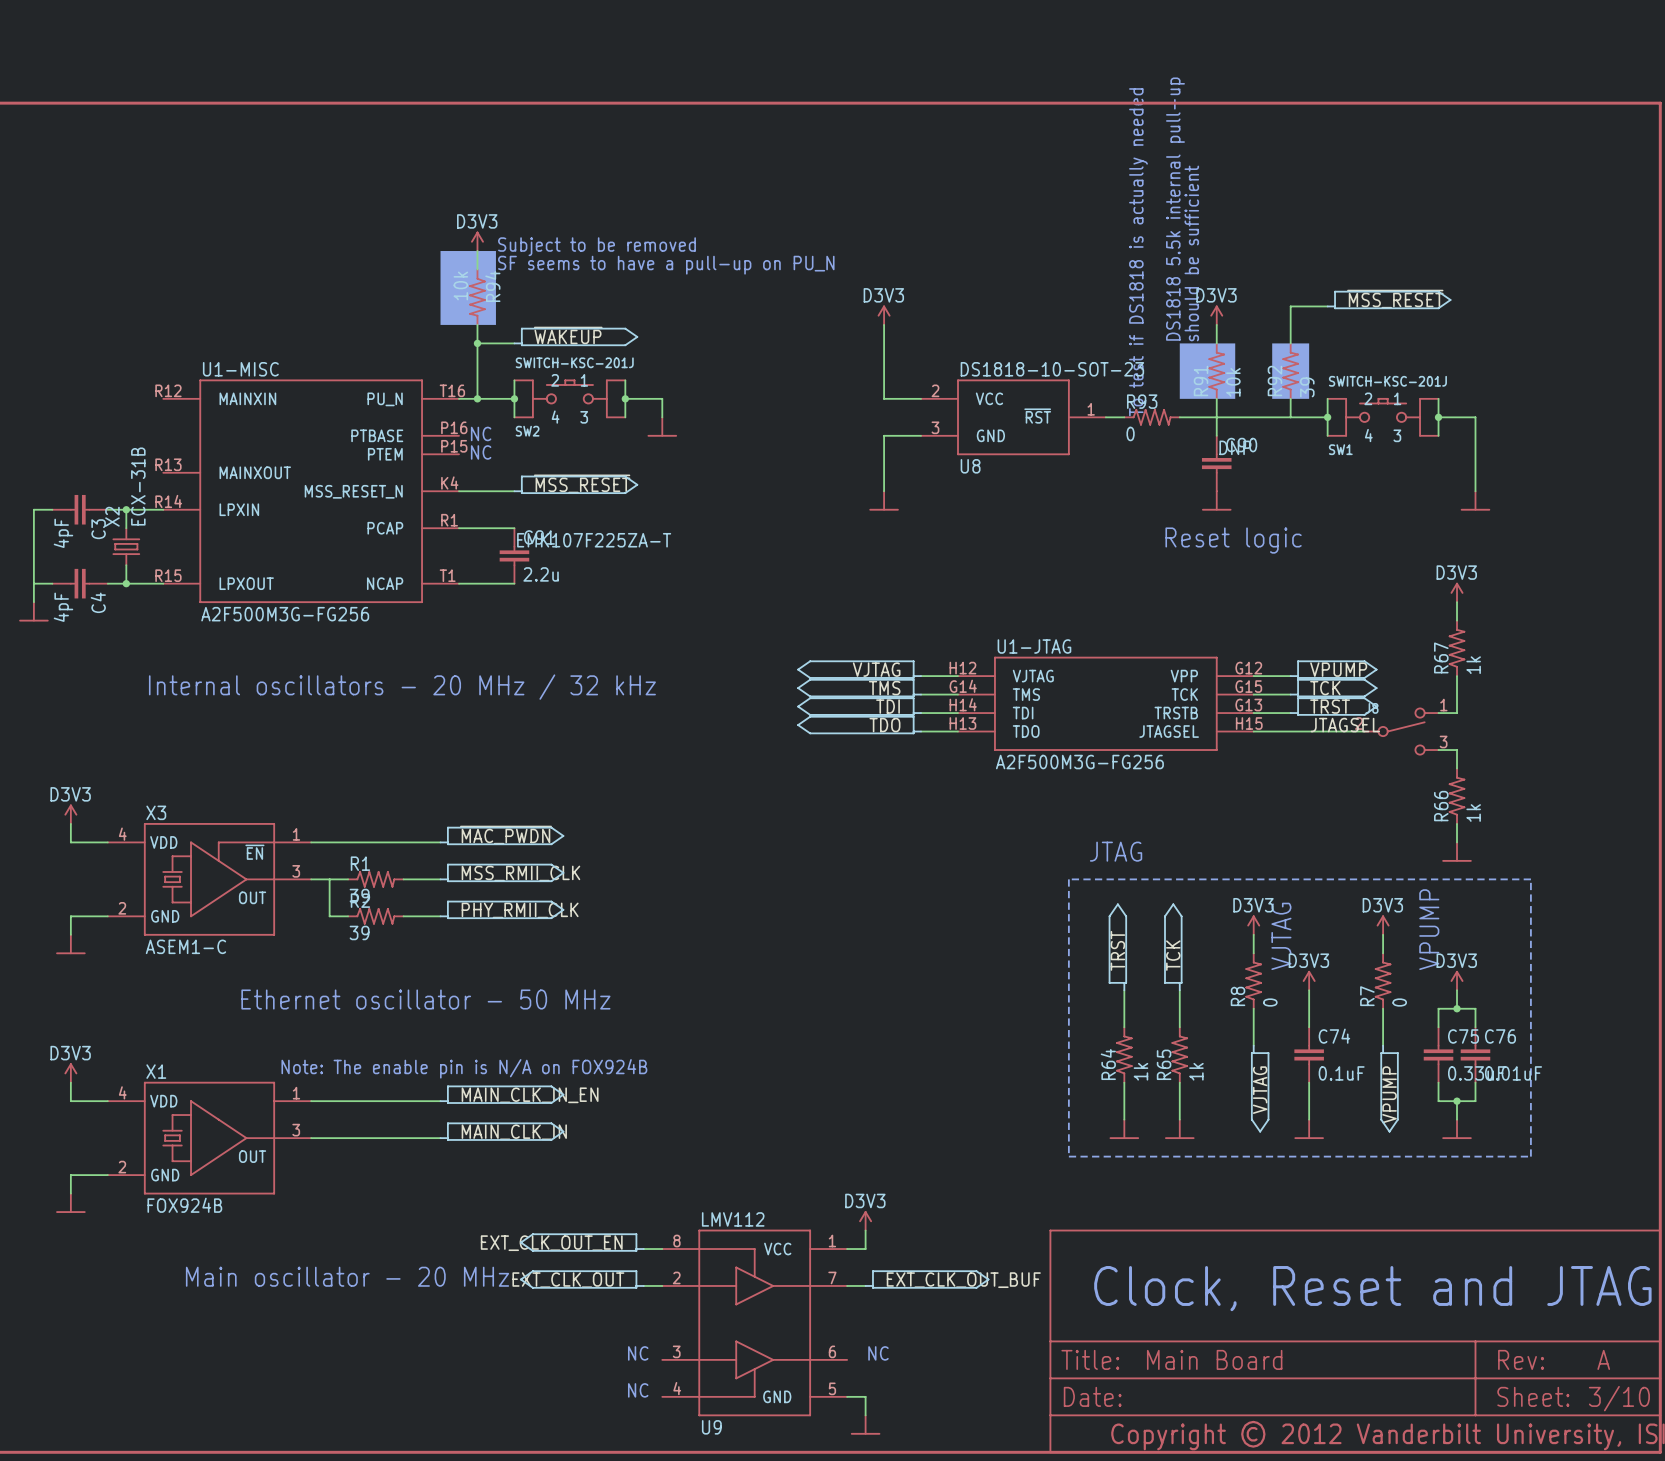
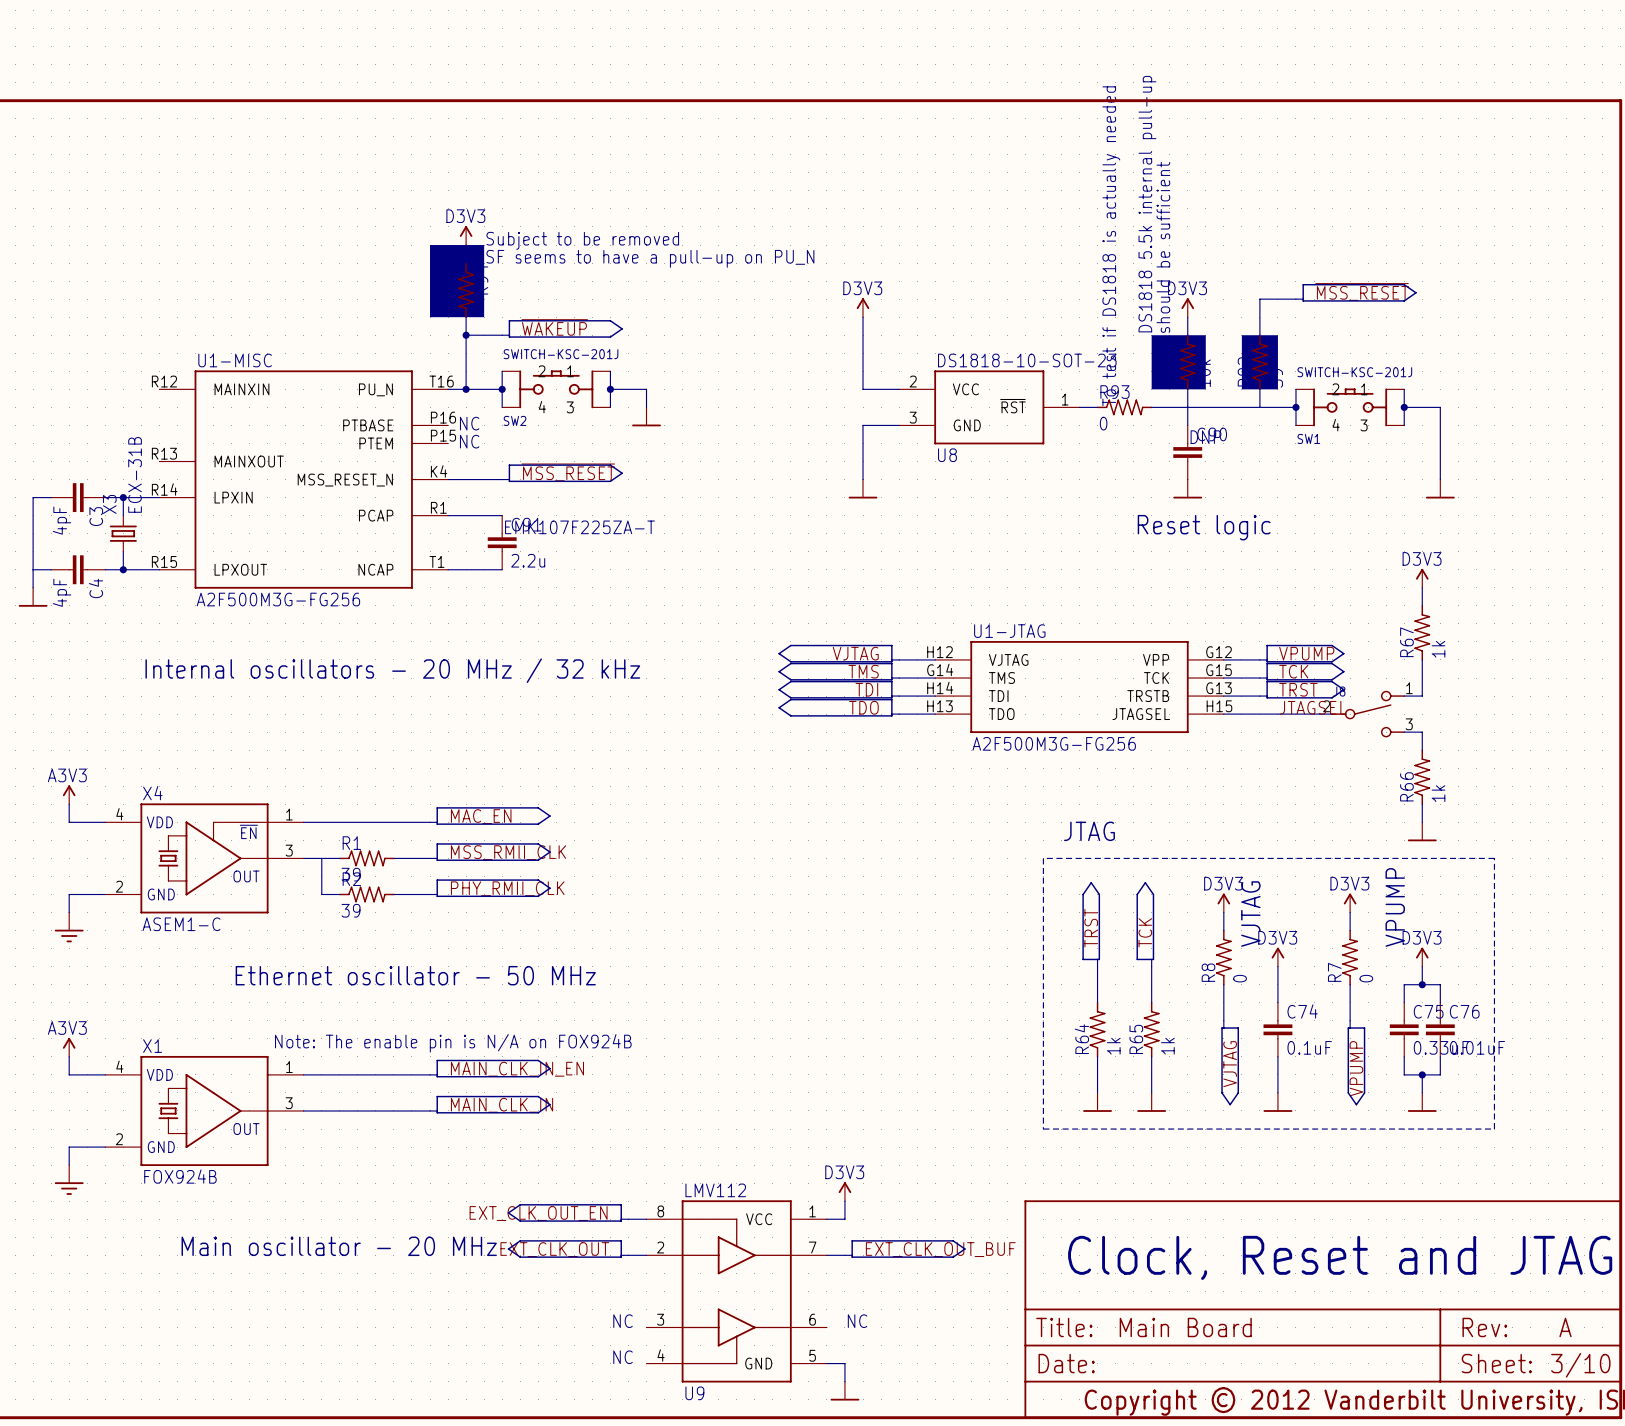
X2 name: X2 (112, 516) -> X3 (109, 504)
X3 name: X3 (156, 812) -> X4 (152, 793)
power symbol: D3V3 (70, 814) -> A3V3 (69, 794)
label: ~{MAC_PWDN} (505, 835) -> MAC_EN (481, 816)
power symbol shape: [56, 934, 86, 955] -> [54, 912, 84, 943]
power symbol: D3V3 (70, 1072) -> A3V3 (69, 1047)
power symbol shape: [56, 1193, 86, 1213] -> [54, 1165, 84, 1195]

